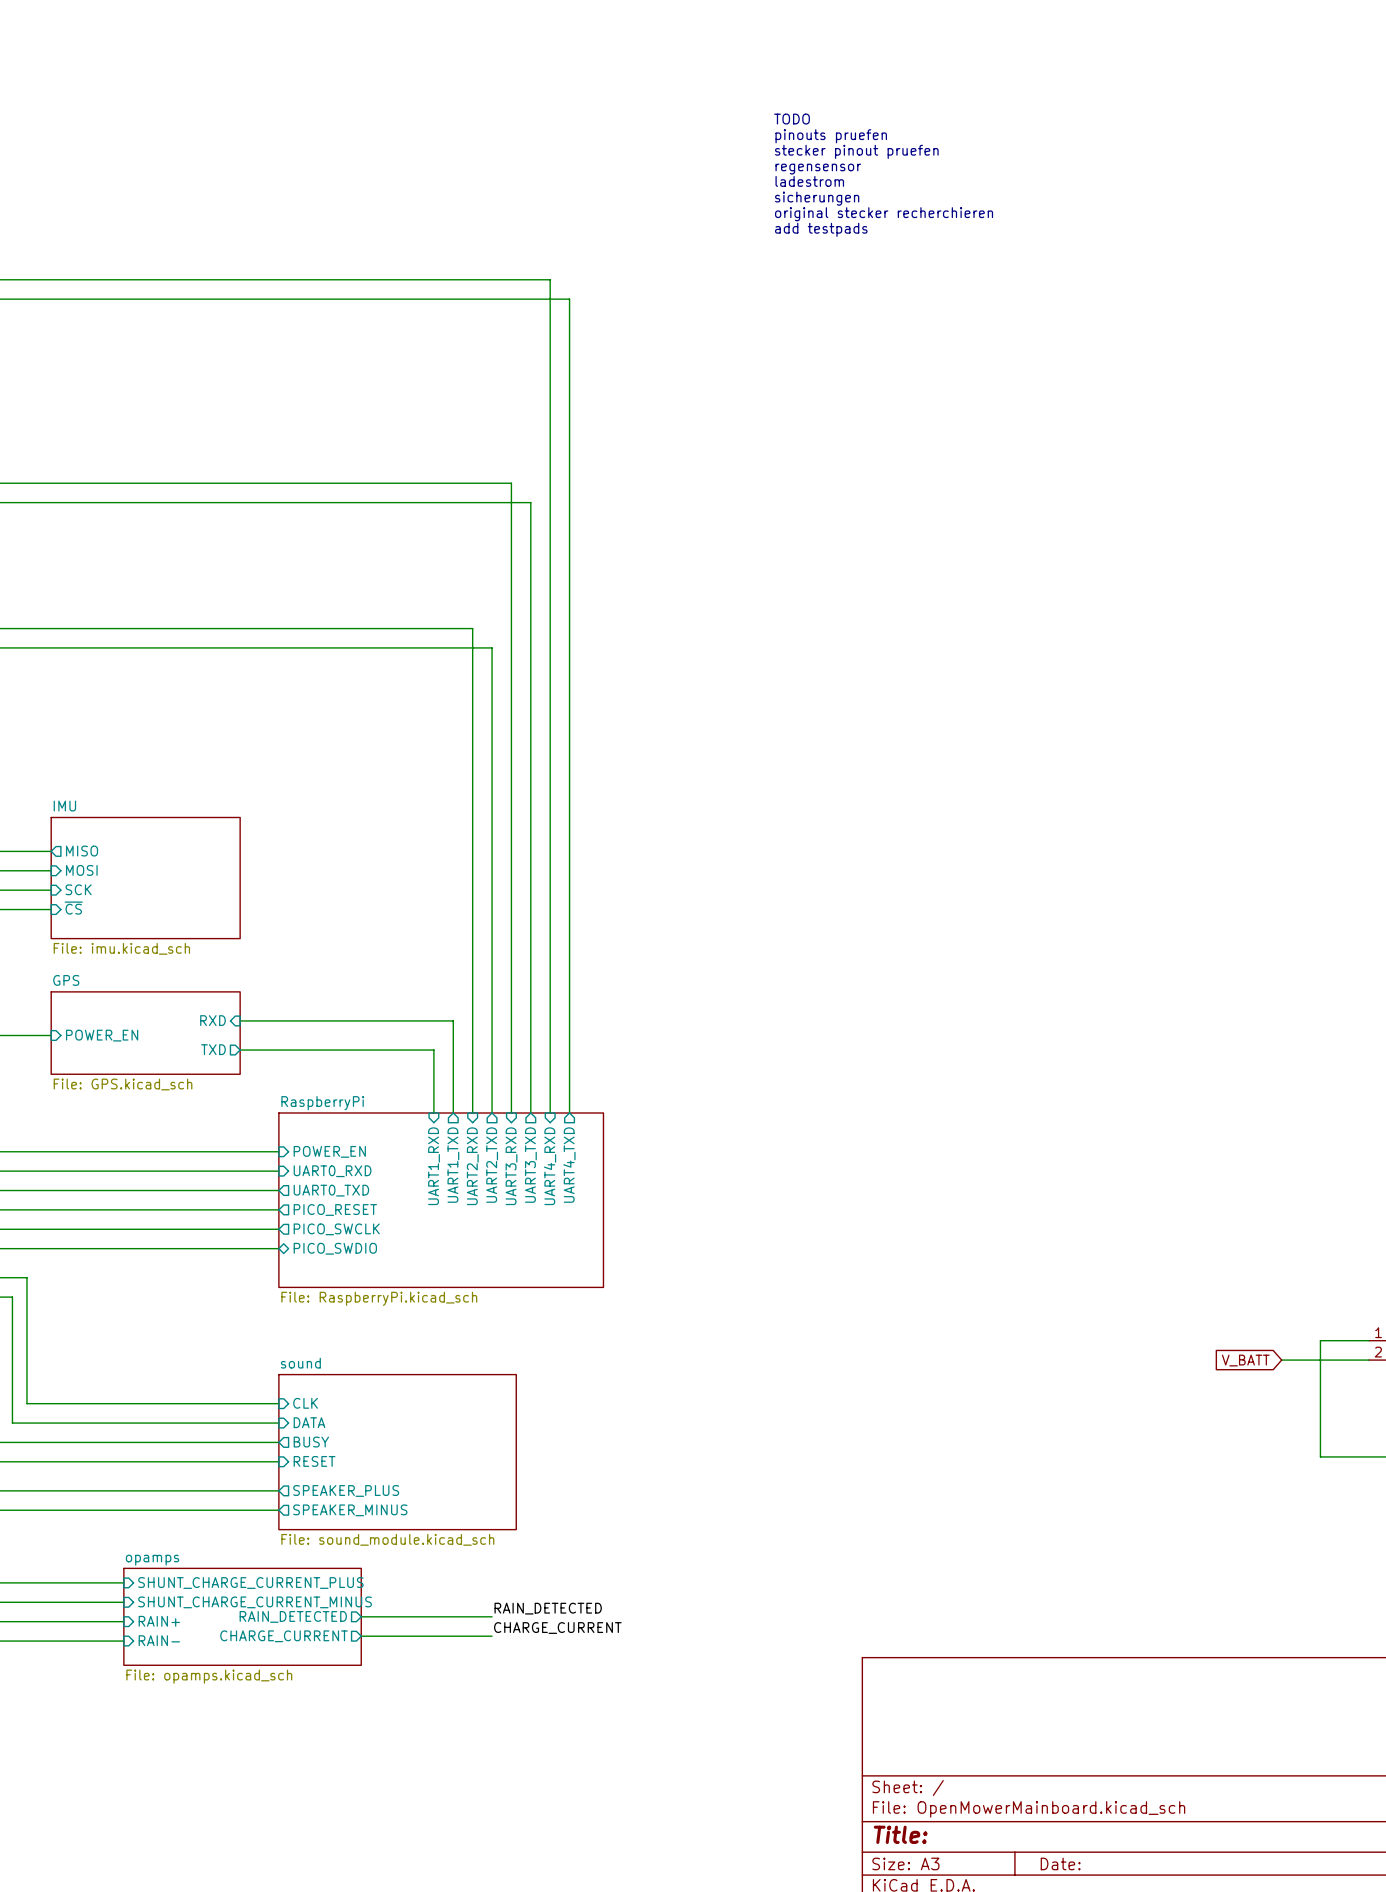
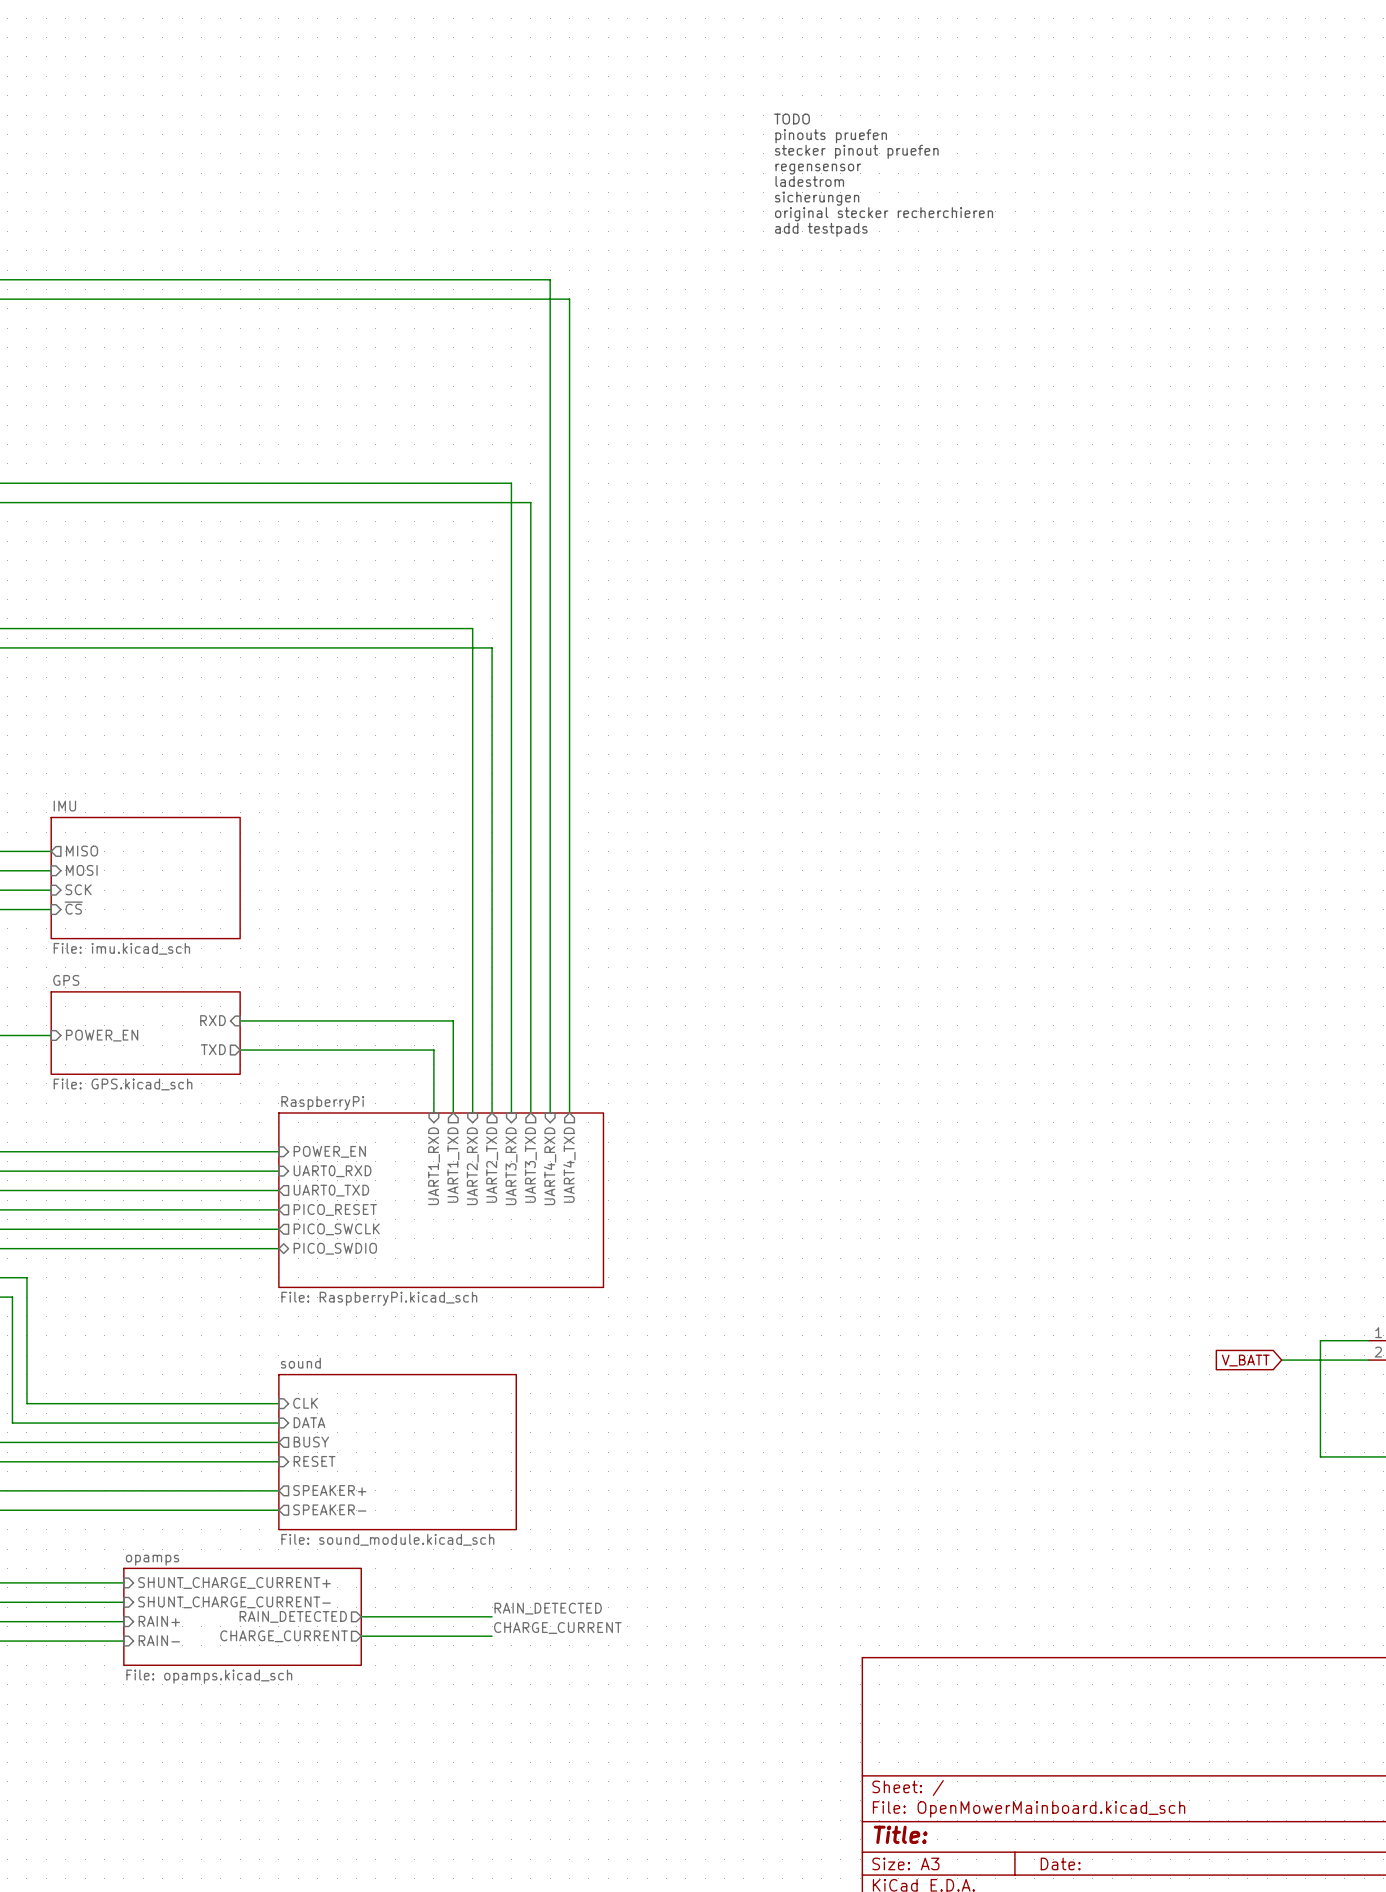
sheet pin: SPEAKER_PLUS (346, 1490) -> SPEAKER+ (329, 1490)
sheet pin: SPEAKER_MINUS (350, 1510) -> SPEAKER- (329, 1509)
sheet pin: SHUNT_CHARGE_CURRENT_PLUS (250, 1583) -> SHUNT_CHARGE_CURRENT+ (234, 1583)
sheet pin: SHUNT_CHARGE_CURRENT_MINUS (255, 1602) -> SHUNT_CHARGE_CURRENT- (234, 1602)

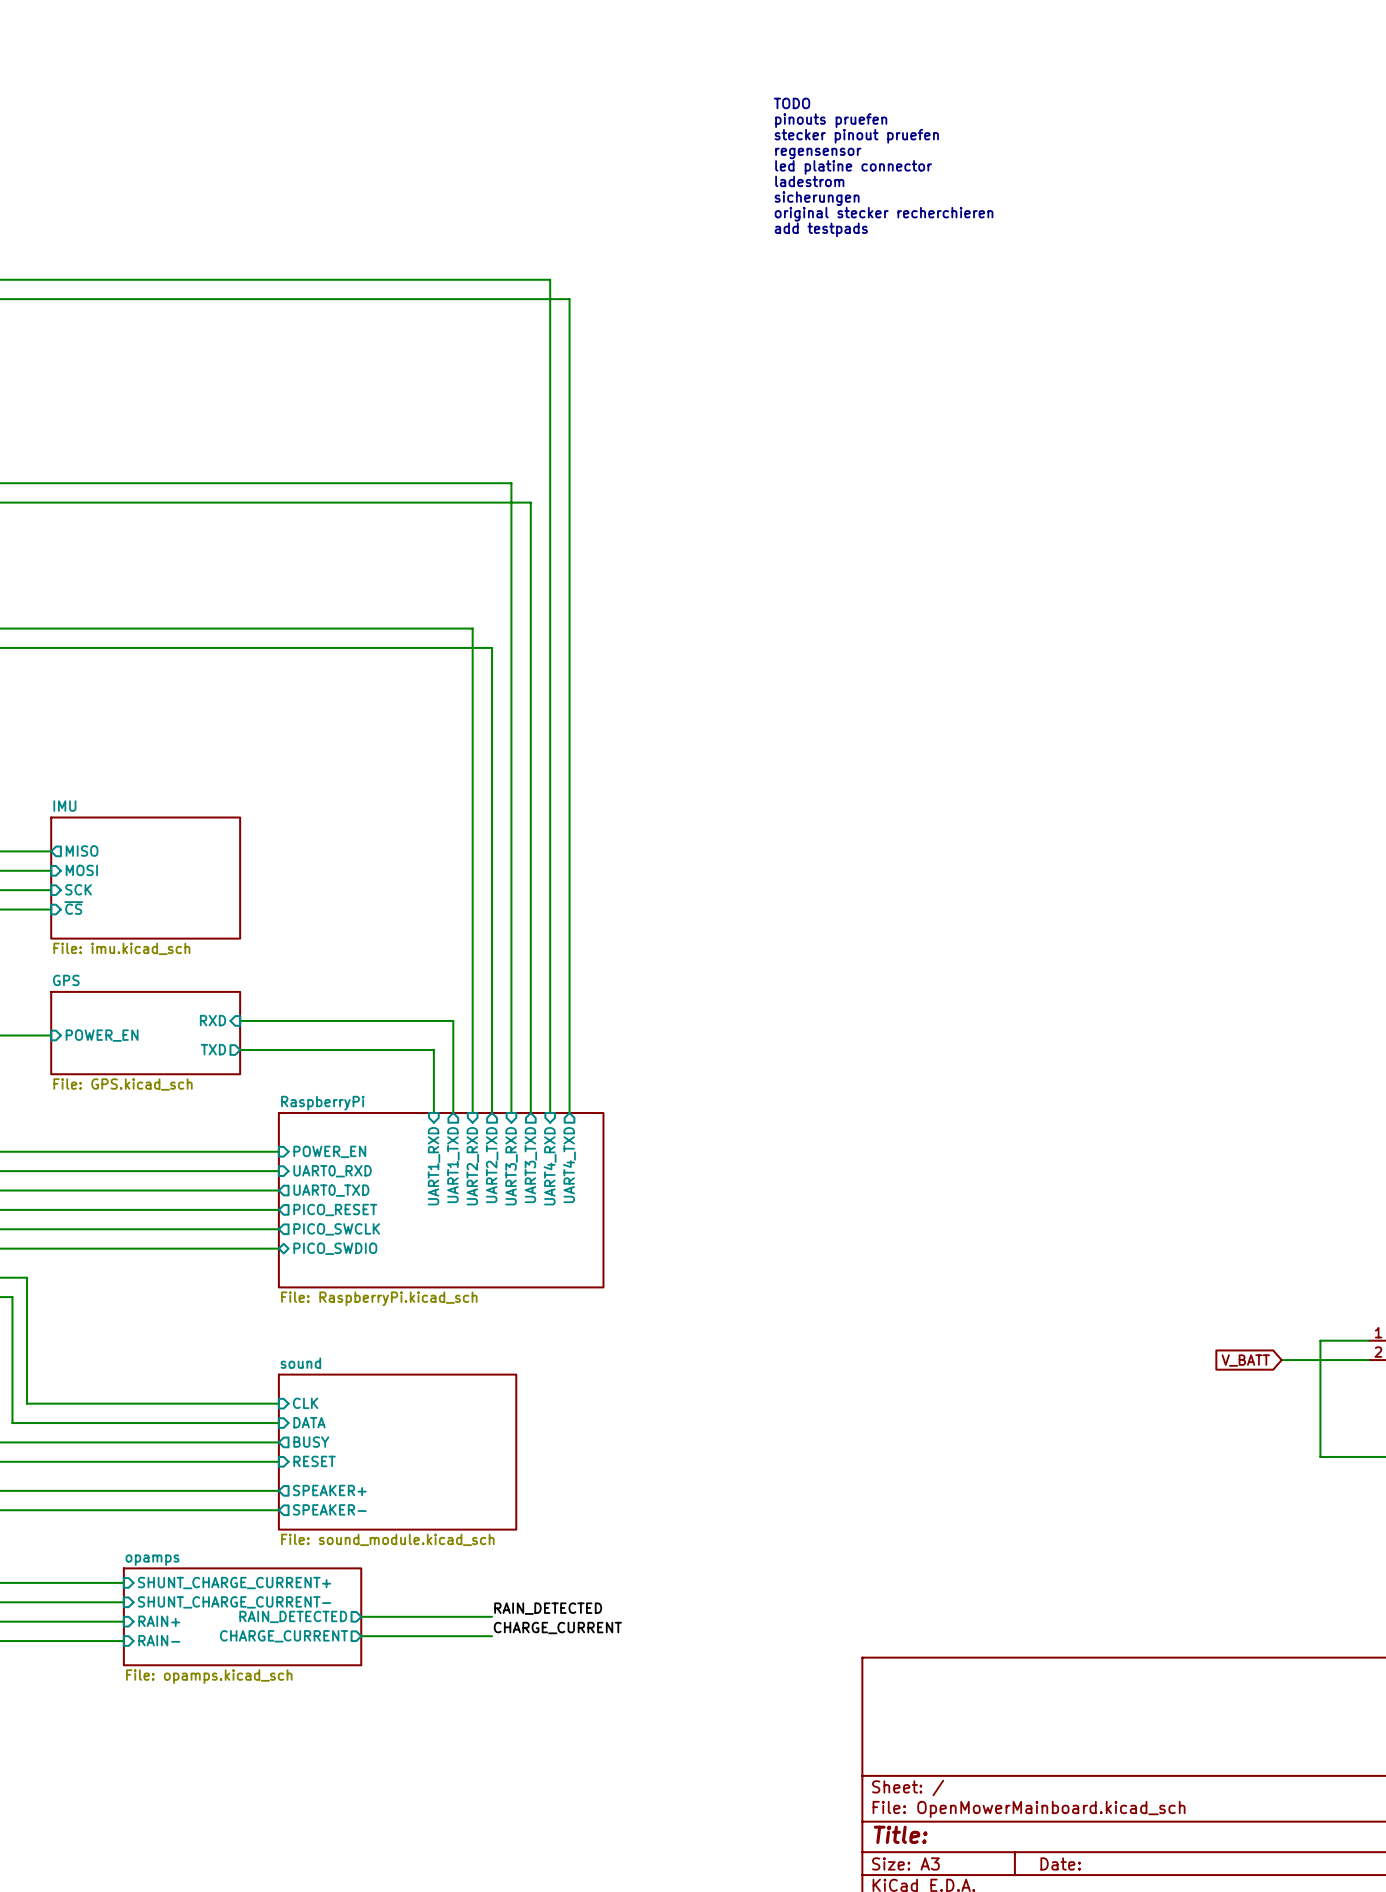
text: none -> TODO (792, 103)
text: TODO (792, 119) -> pinouts pruefen (831, 120)
text: pinouts pruefen (831, 136) -> stecker pinout pruefen (856, 136)
text: stecker pinout pruefen (856, 151) -> regensensor (818, 153)
text: regensensor (818, 169) -> led platine connector (853, 167)

